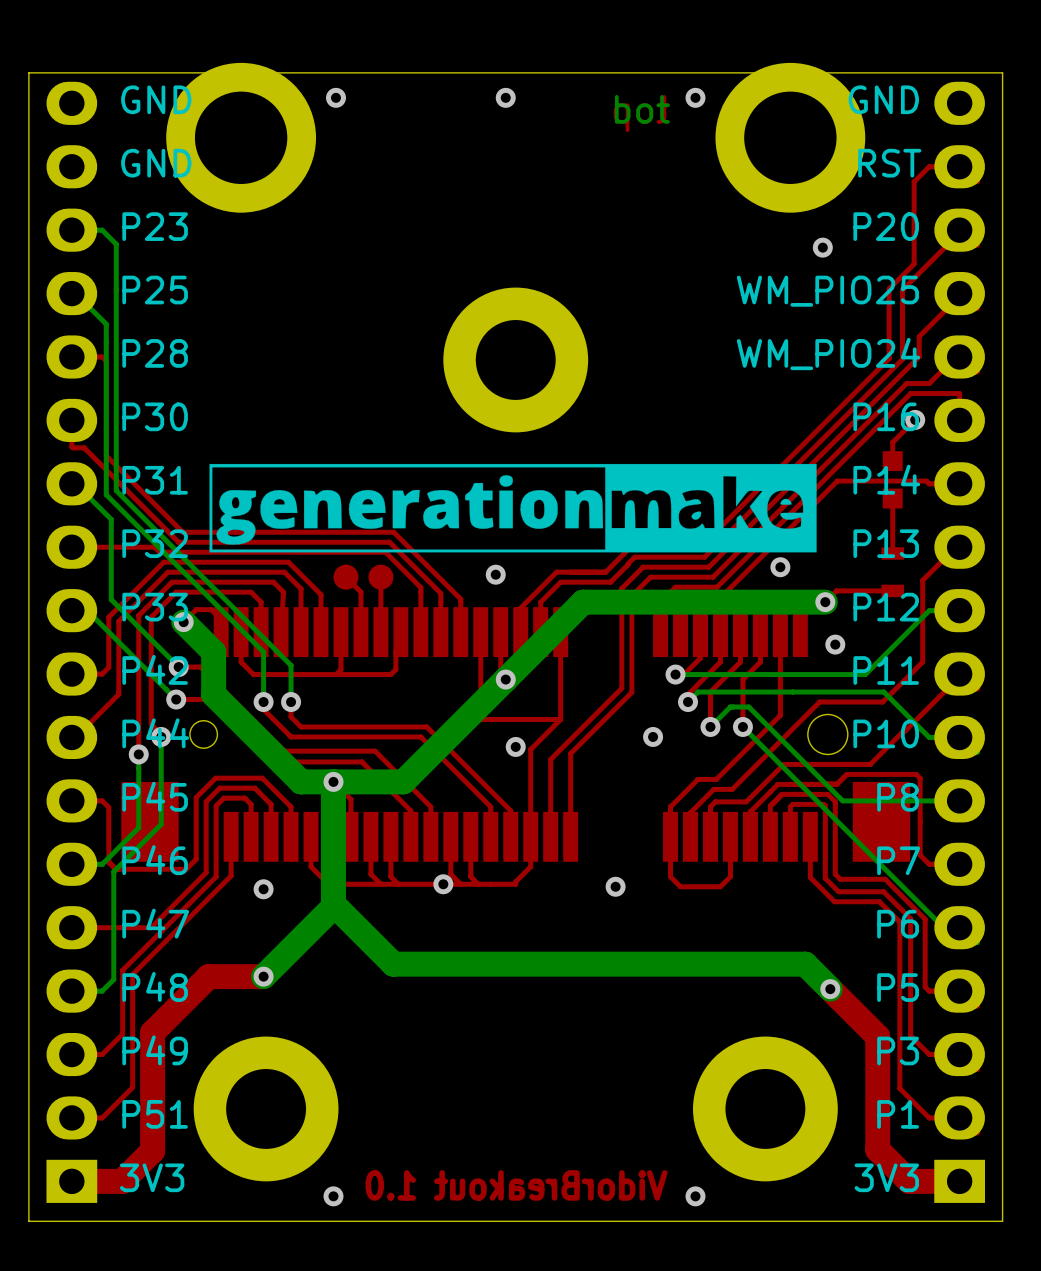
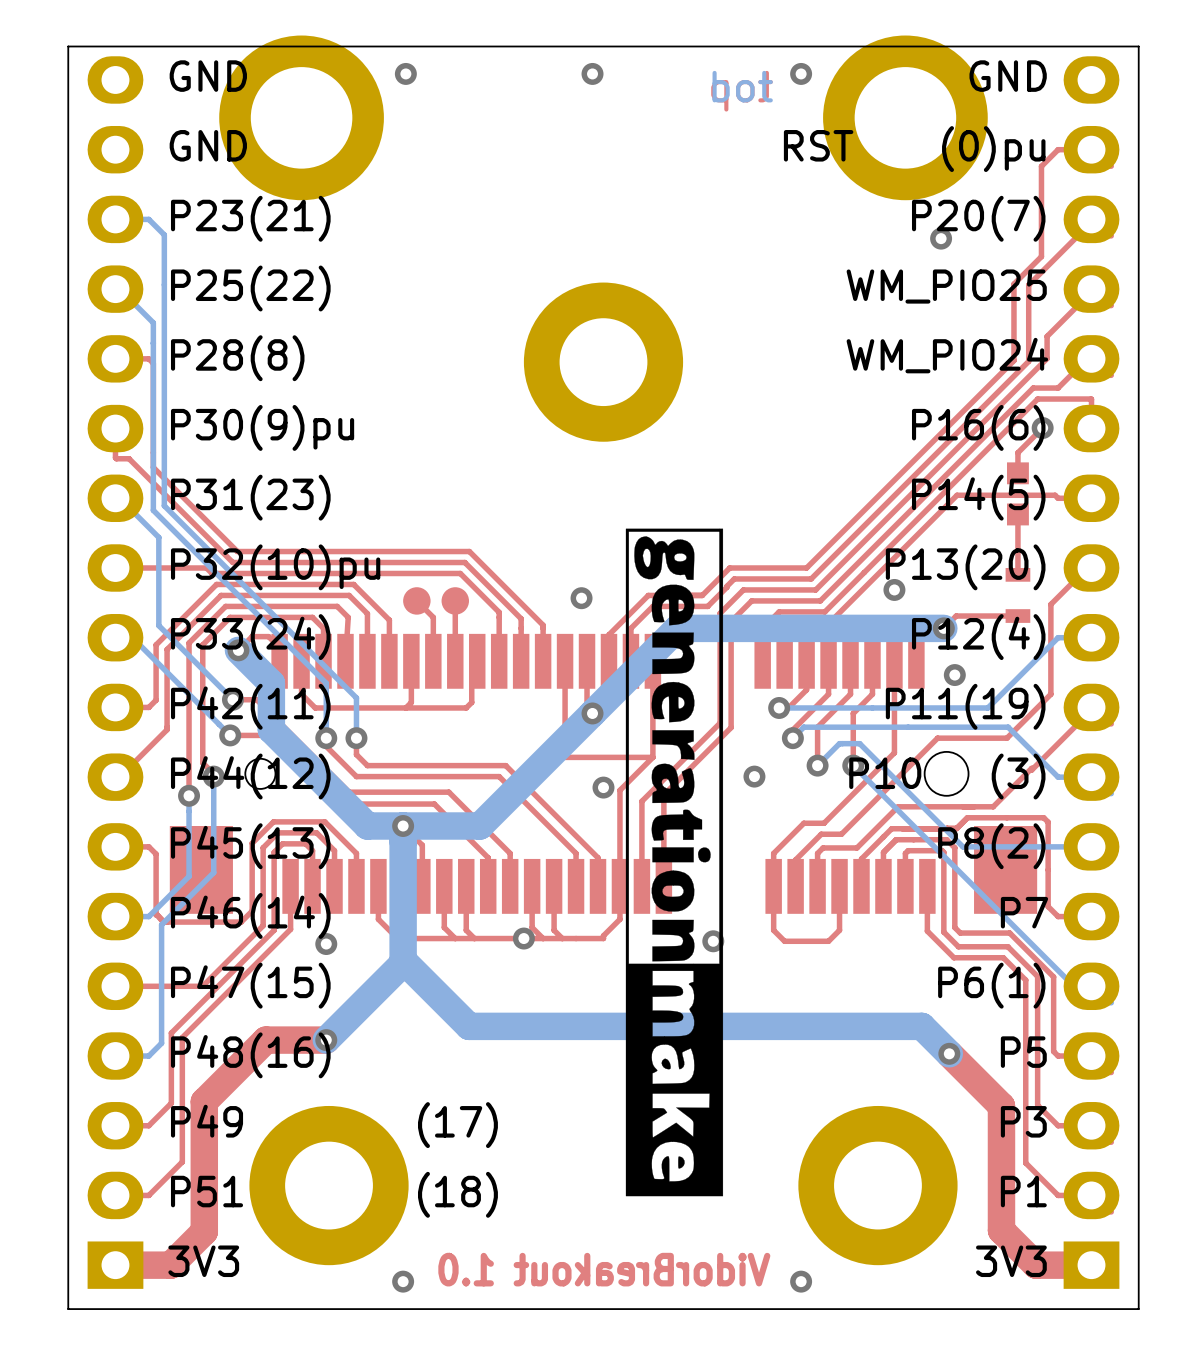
text: RST (889, 163) -> RST (0)pu (914, 149)
text: P23 (155, 226) -> P23(21) (250, 218)
text: P20 (886, 226) -> P20(7) (978, 218)
text: P25 (155, 290) -> P25(22) (250, 288)
text: P28 (155, 353) -> P28(8) (237, 358)
text: P30 (155, 416) -> P30(9)pu (262, 427)
text: P16 (886, 416) -> P16(6) (978, 427)
drawing: [209, 463, 817, 553] -> none
text: P14 (886, 479) -> P14(5) (978, 497)
text: P31 (155, 480) -> P31(23) (250, 497)
drawing: none -> [625, 528, 724, 1197]
text: P32 (155, 543) -> P32(10)pu (275, 567)
text: P13 (886, 543) -> P13(20) (965, 567)
text: P33 (155, 607) -> P33(24) (250, 637)
text: P12 (886, 607) -> P12(4) (978, 637)
text: P42 (155, 669) -> P42(11) (250, 706)
text: P11 (886, 670) -> P11(19) (965, 706)
text: P44 (155, 733) -> P44(12) (250, 776)
text: P10 (886, 733) -> P10 (3) (947, 776)
text: P45 (155, 796) -> P45(13) (250, 846)
text: P8 (898, 797) -> P8(2) (991, 846)
text: P46 (155, 860) -> P46(14) (250, 915)
text: P47 (155, 923) -> P47(15) (250, 985)
text: P6 (898, 924) -> P6(1) (991, 985)
text: P48 (155, 986) -> P48(16) (250, 1055)
text: P49 (155, 1050) -> P49 (17) (334, 1125)
text: P51 (155, 1114) -> P51 (18) (334, 1194)

